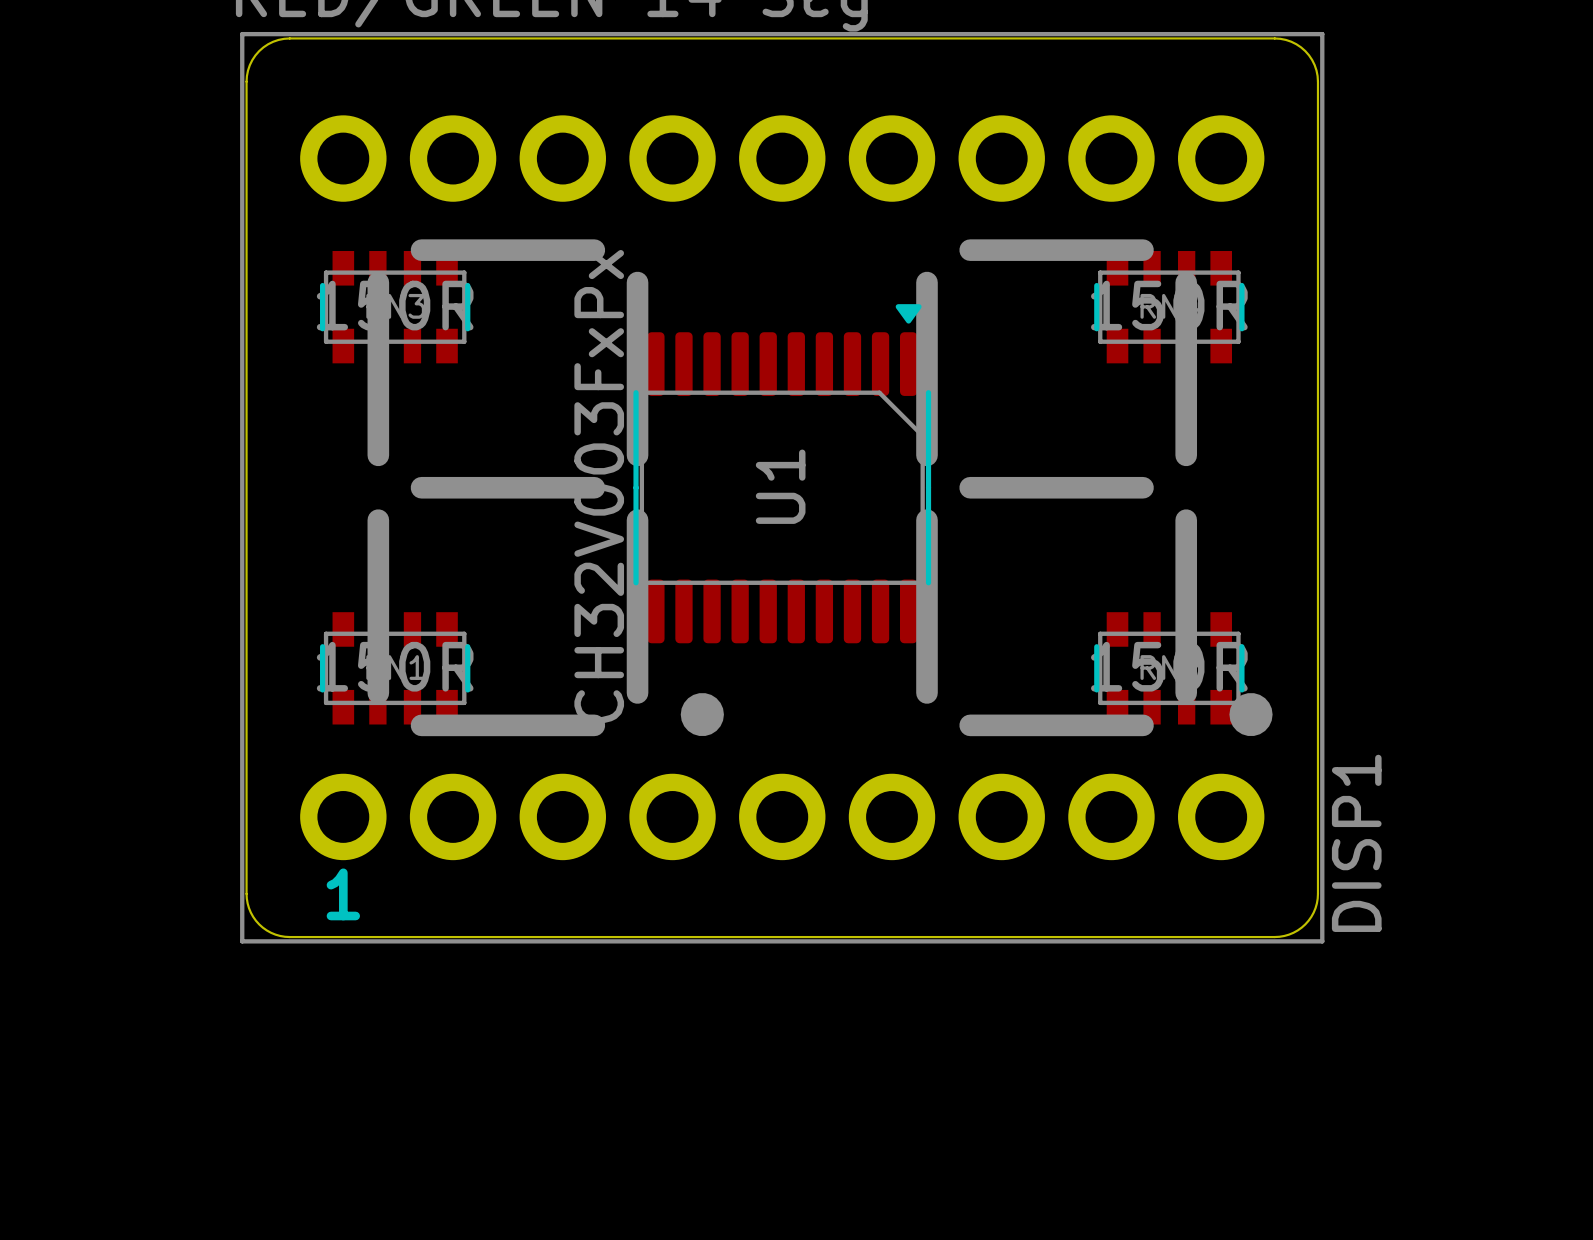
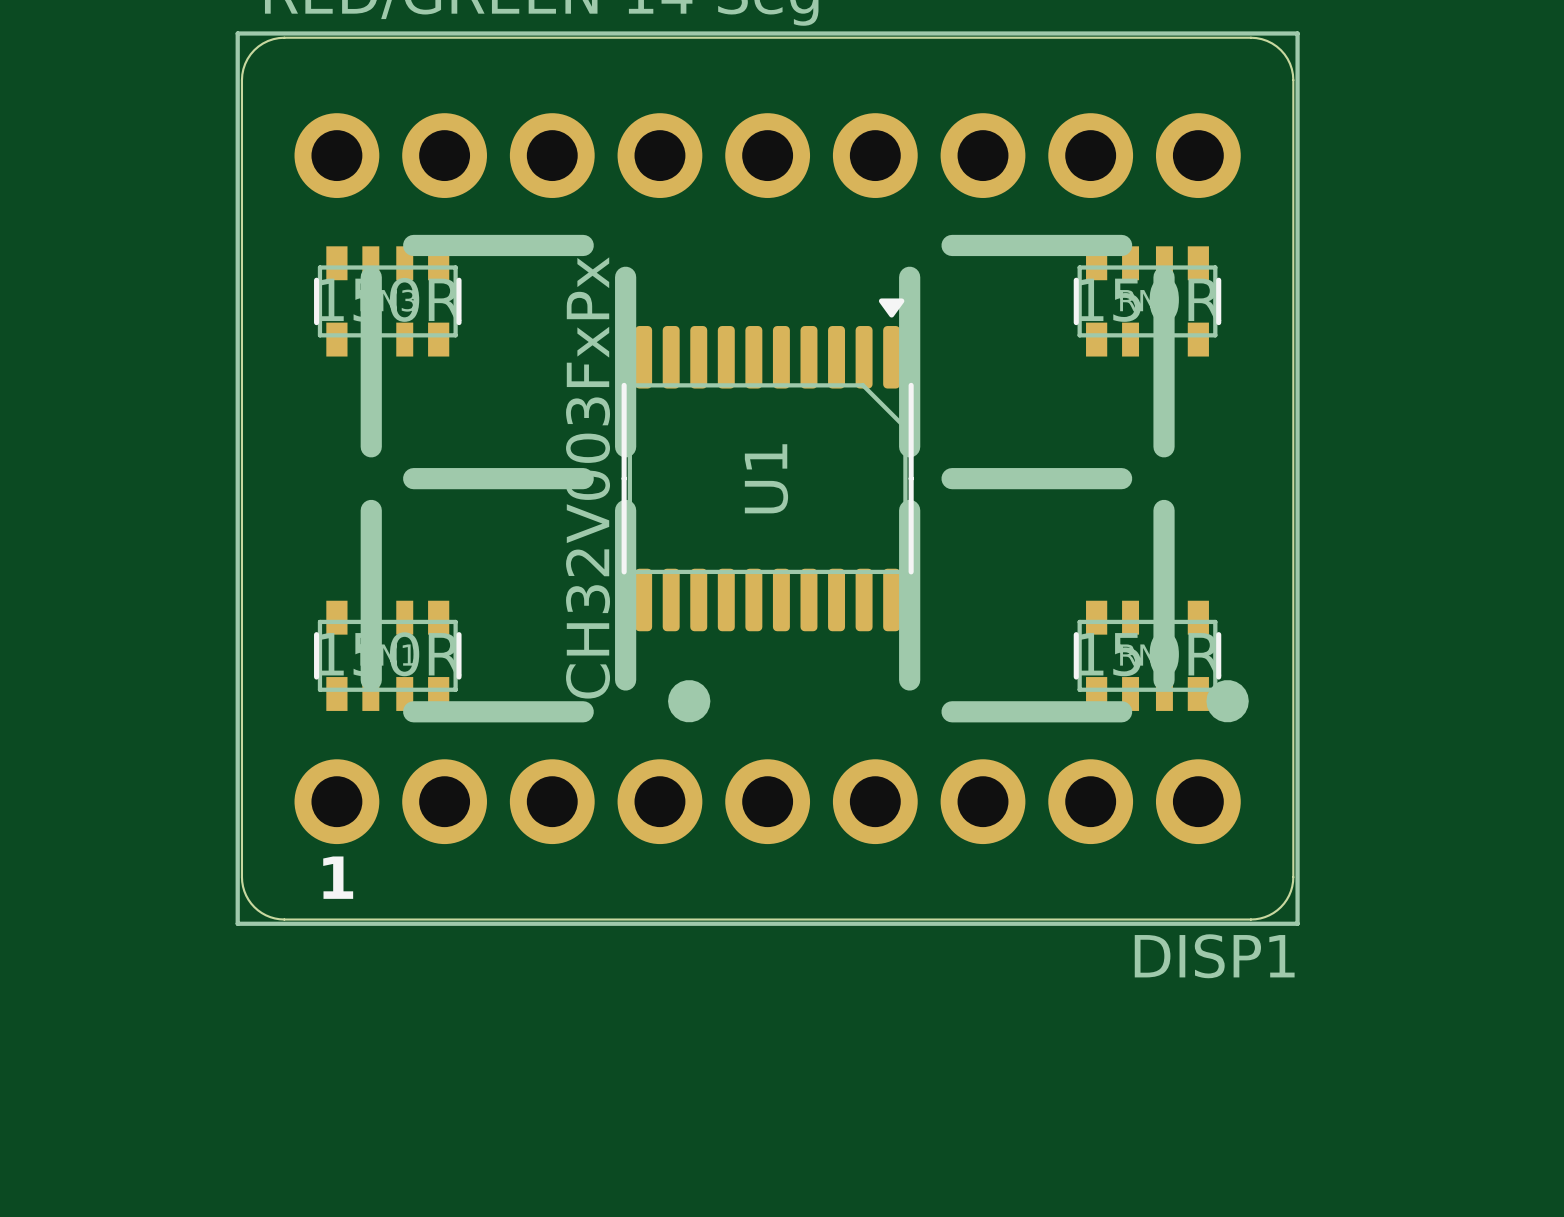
DISP1 name rotation: 0° (1356, 843) -> 90° clockwise (1214, 956)

